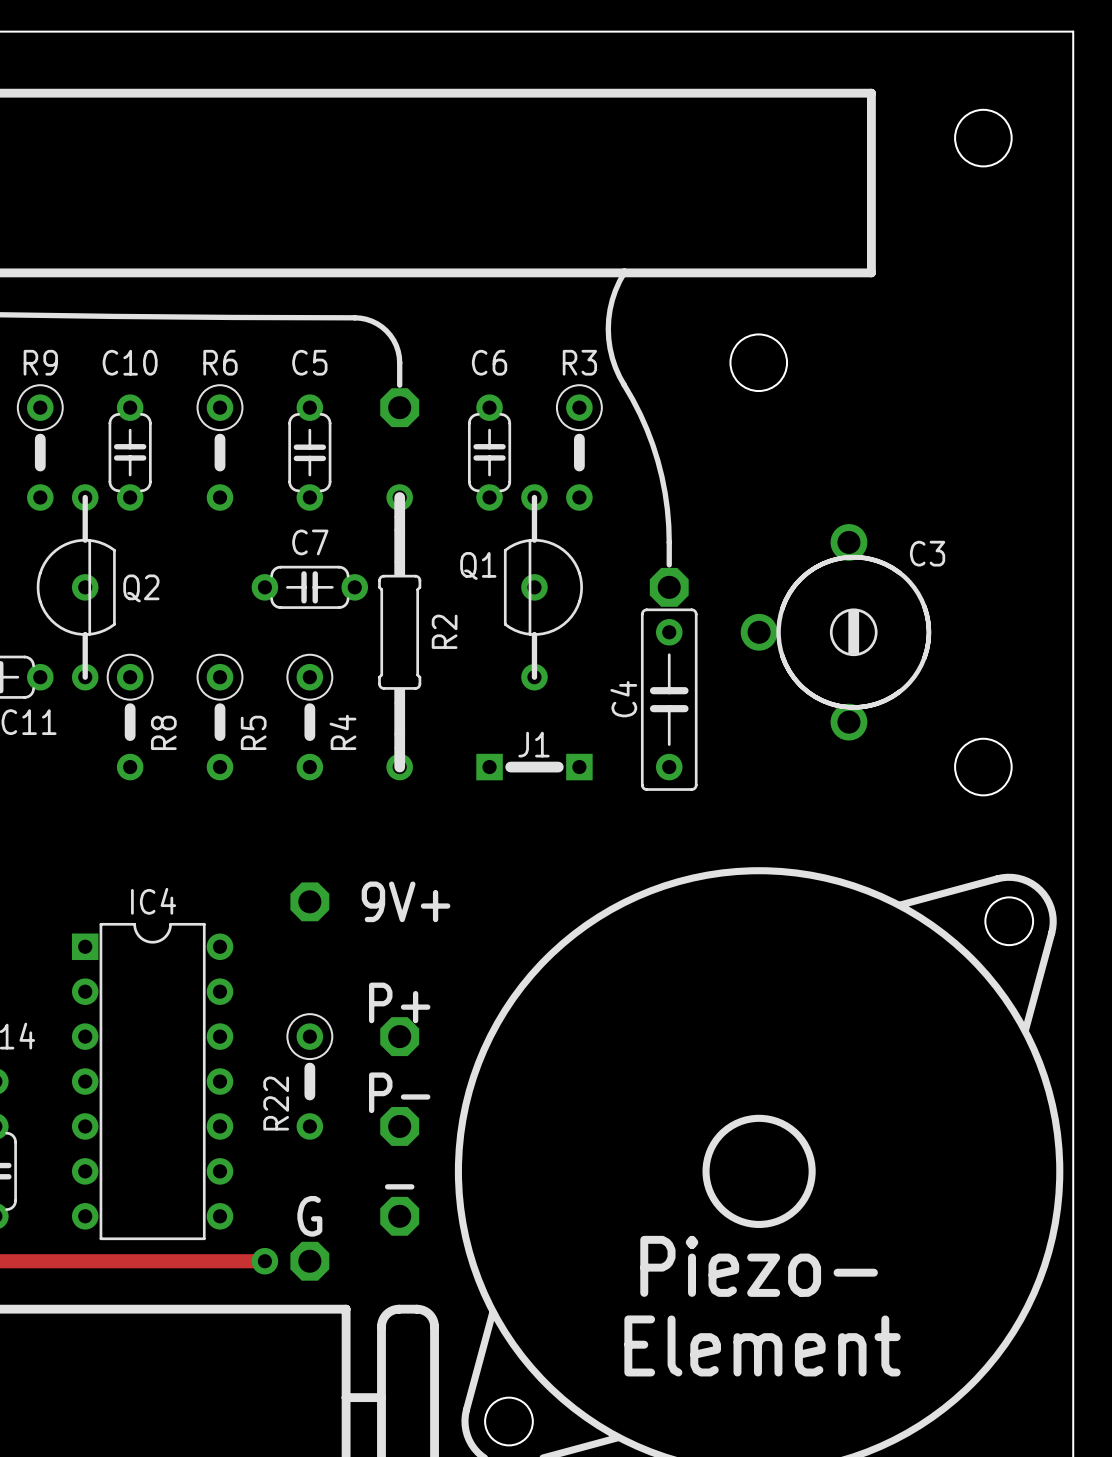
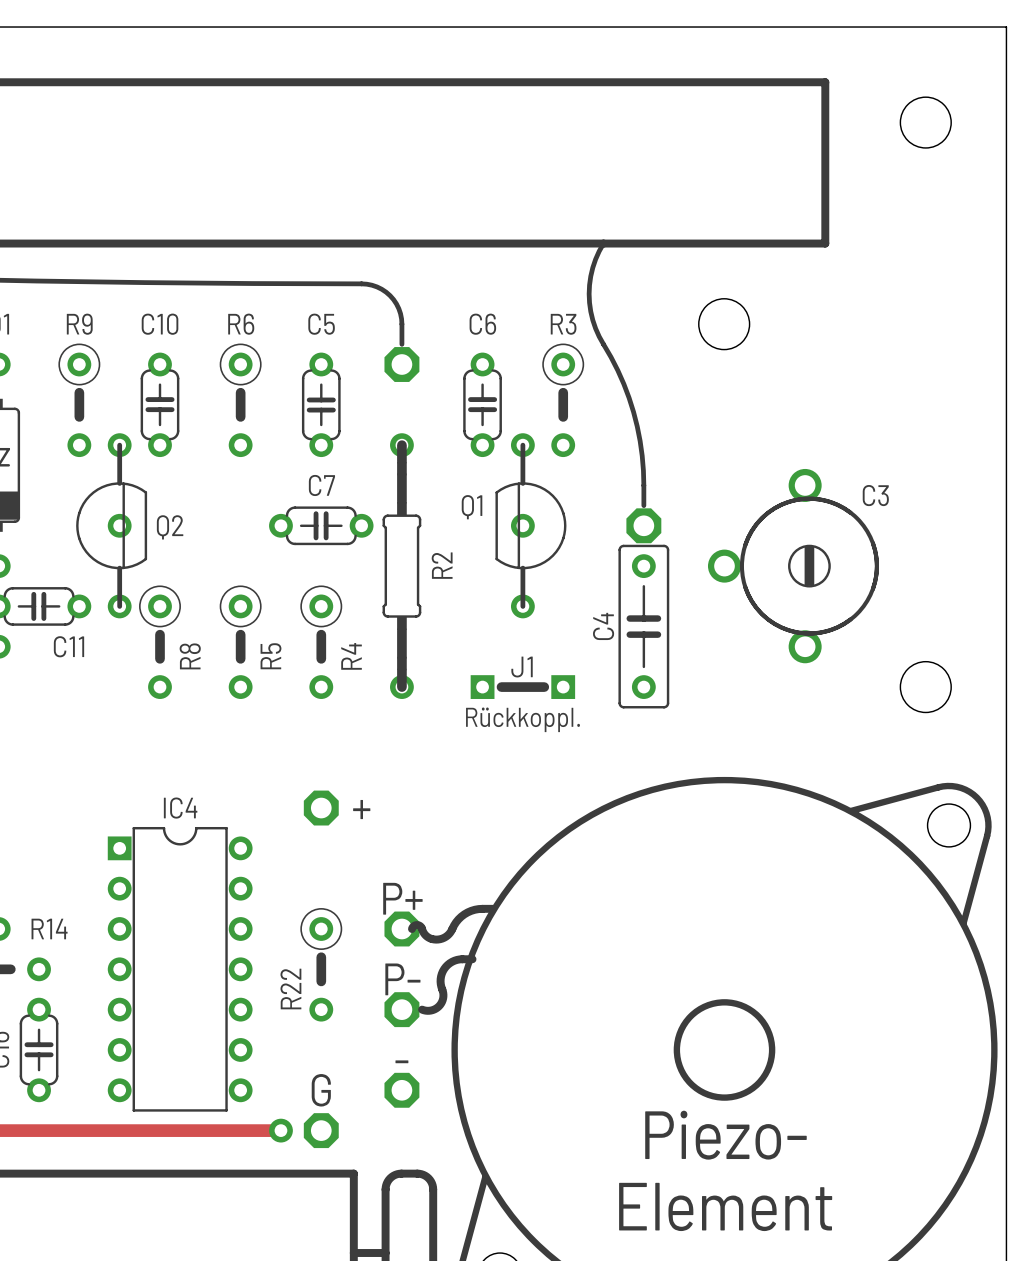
text: none -> Rückkoppl. (523, 719)
text: 9V+ (406, 901) -> + (361, 809)
line: none -> (492, 908) (478, 909) (467, 912) (458, 919) (449, 934) (440, 939) (428, 937) (418, 925) (414, 925) (412, 929)
line: none -> (472, 959) (457, 959) (447, 964) (441, 976) (443, 994) (441, 1003) (432, 1010) (422, 1009)

